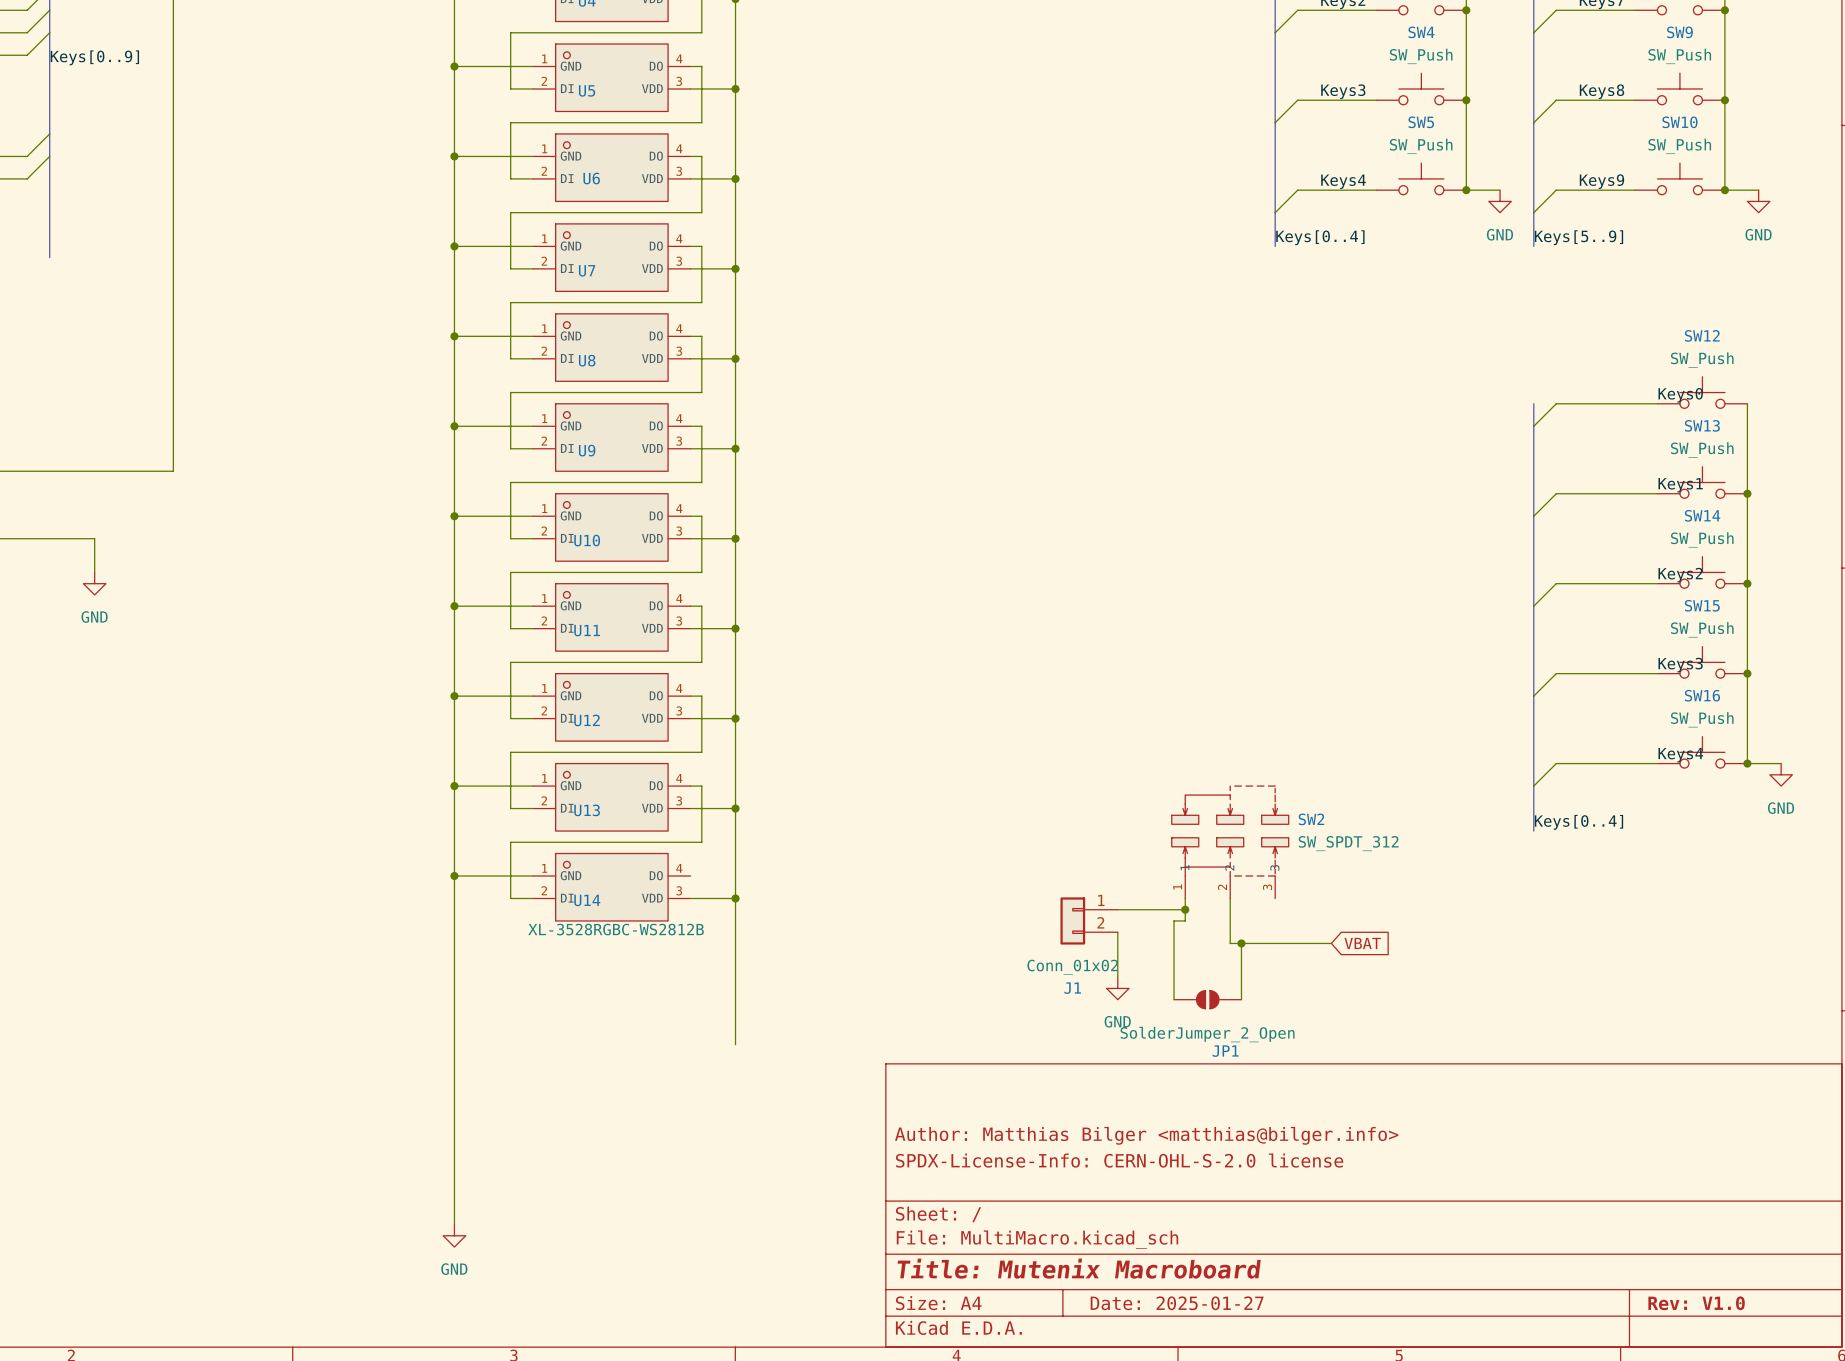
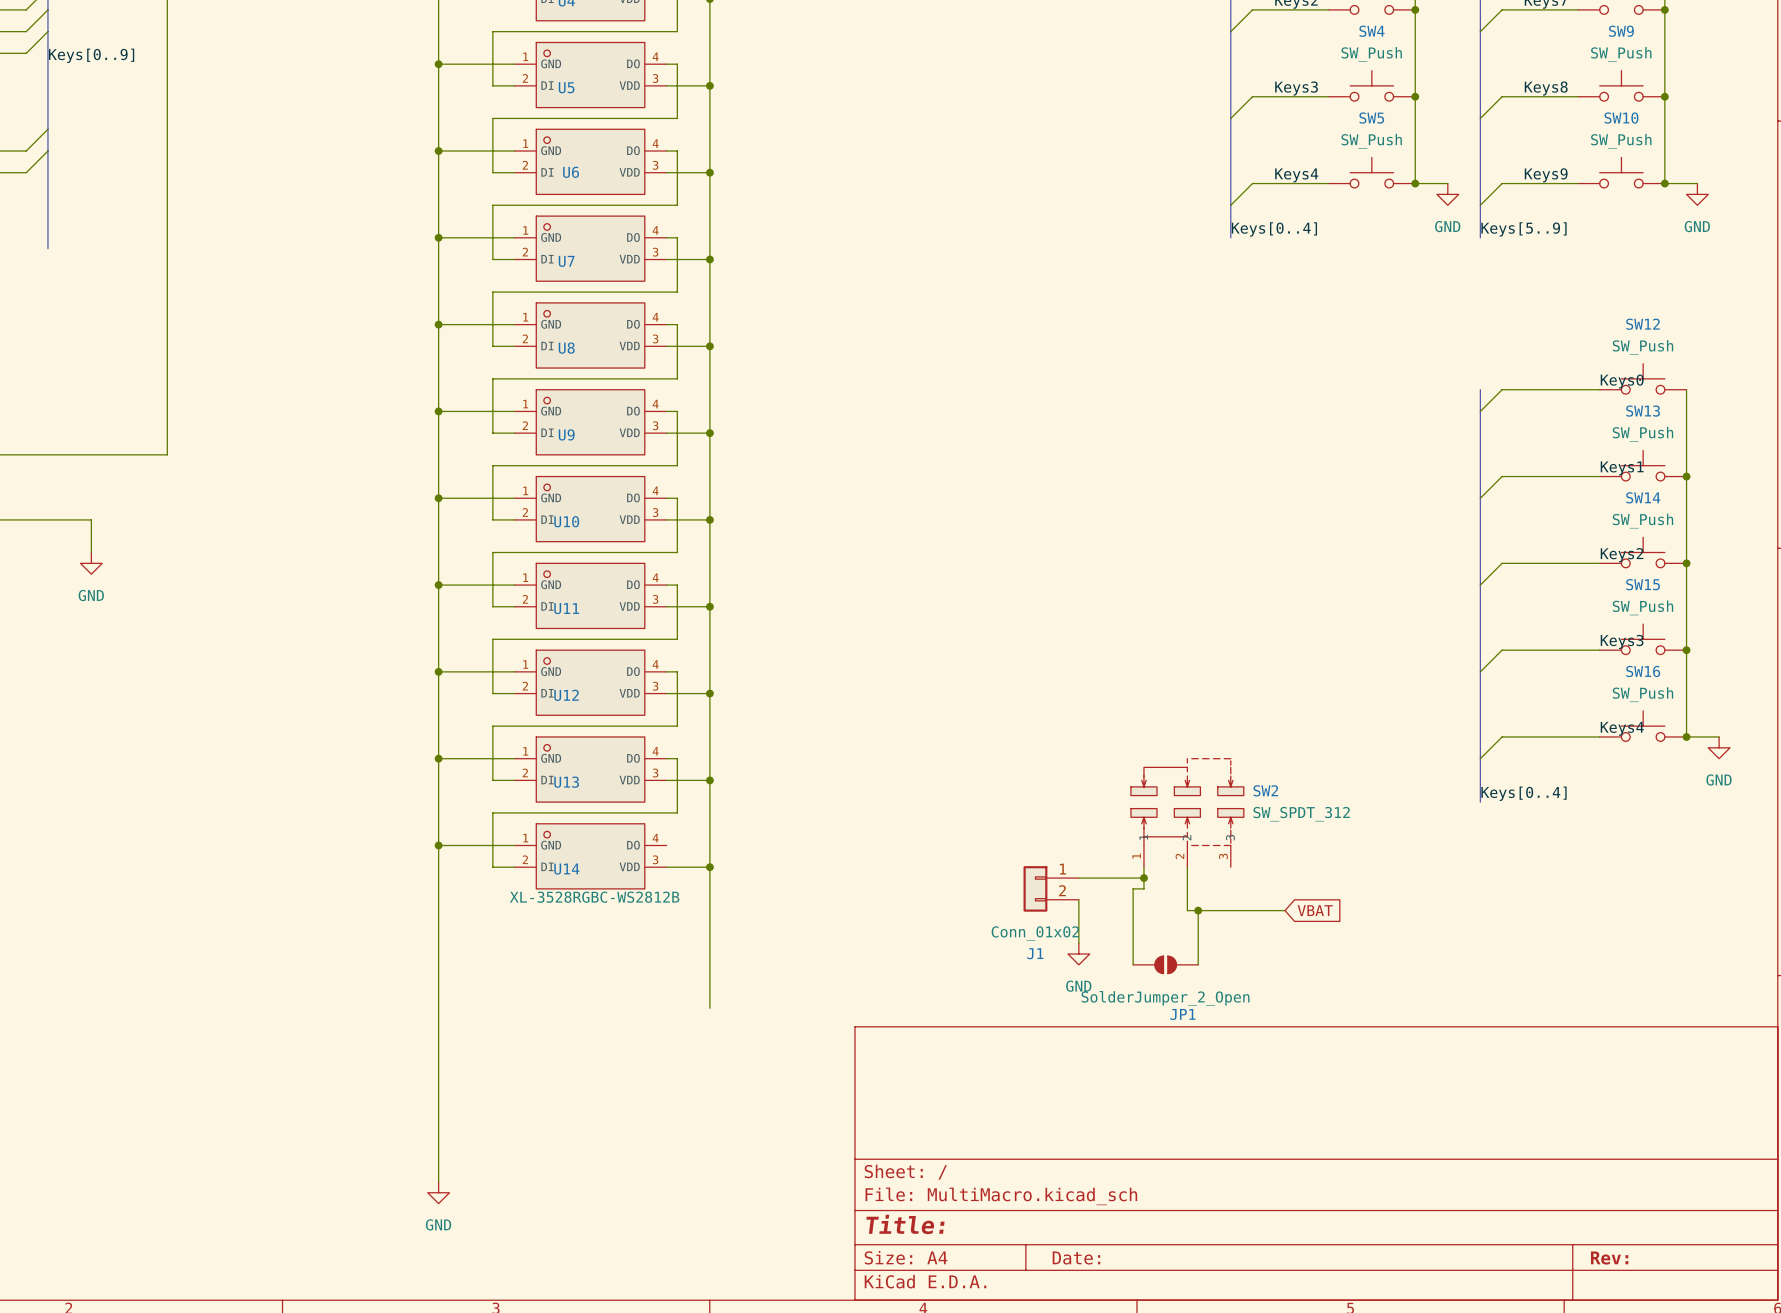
title block: Author: Matthias Bilger <matthias@bilger.info> (1146, 1135) -> none
title block: SPDX-License-Info: CERN-OHL-S-2.0 license (1119, 1160) -> none
title block: Title: Mutenix Macroboard (1079, 1268) -> Title: (905, 1224)
title block: Date: 2025-01-27 (1177, 1303) -> Date: (1076, 1258)
title block: Rev: V1.0 (1696, 1303) -> Rev: (1609, 1258)

